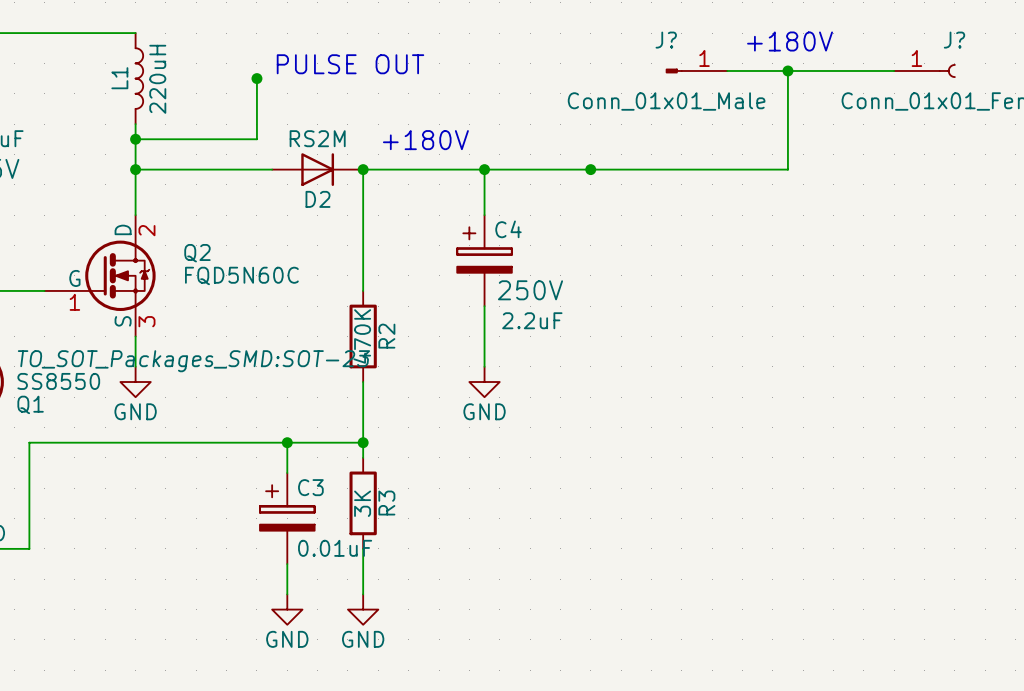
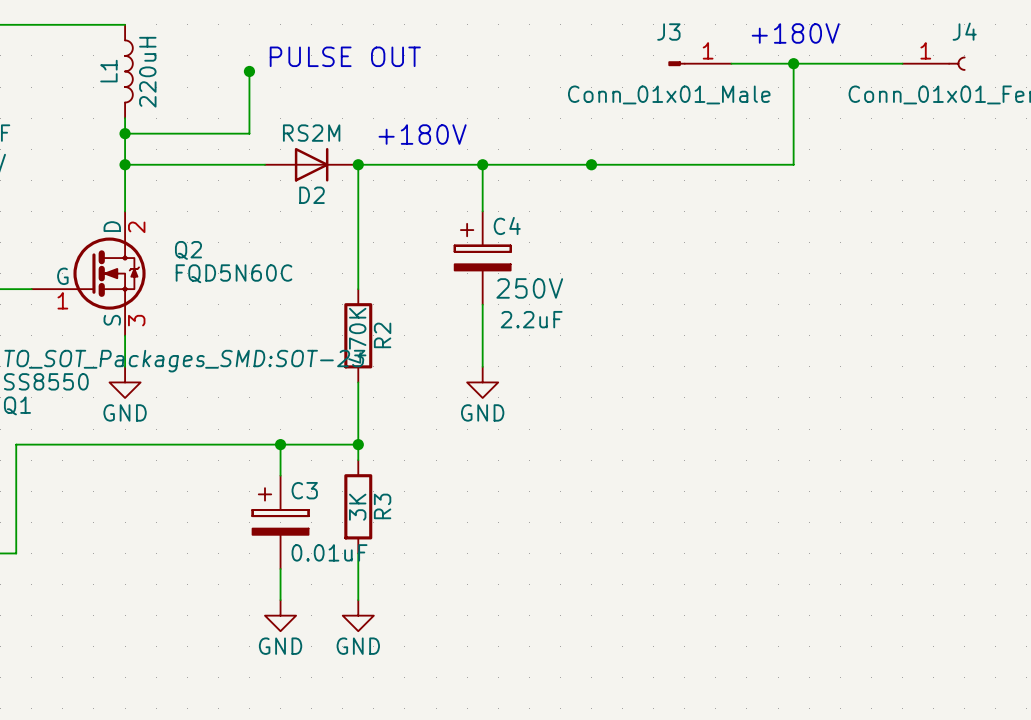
J? name: J? (666, 40) -> J3 (668, 32)
J? name: J? (954, 40) -> J4 (964, 31)

